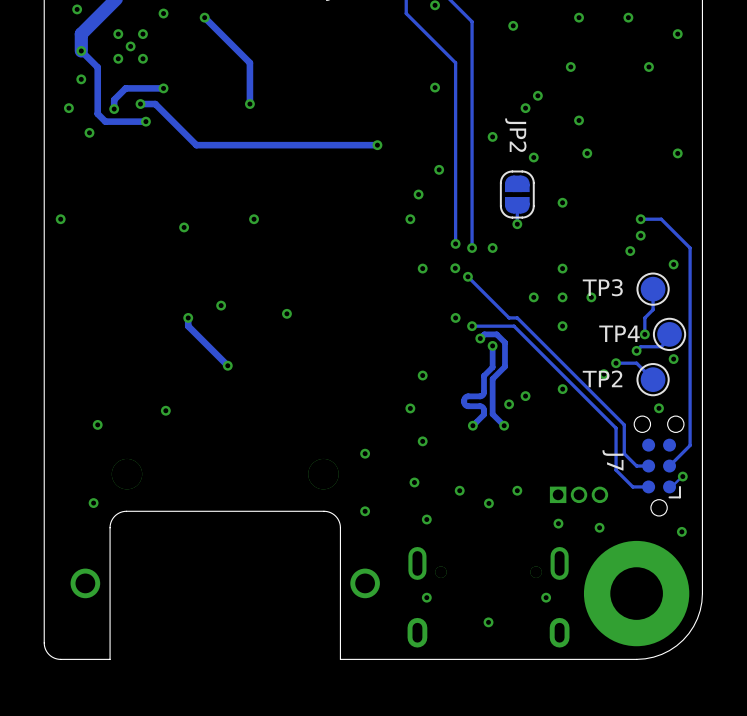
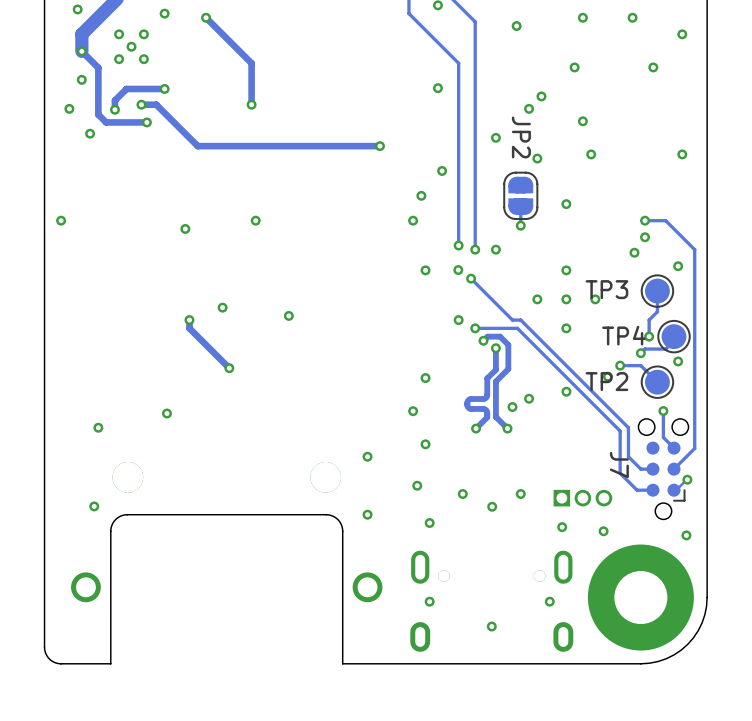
track: none -> (663, 411) (663, 437) (674, 448)

